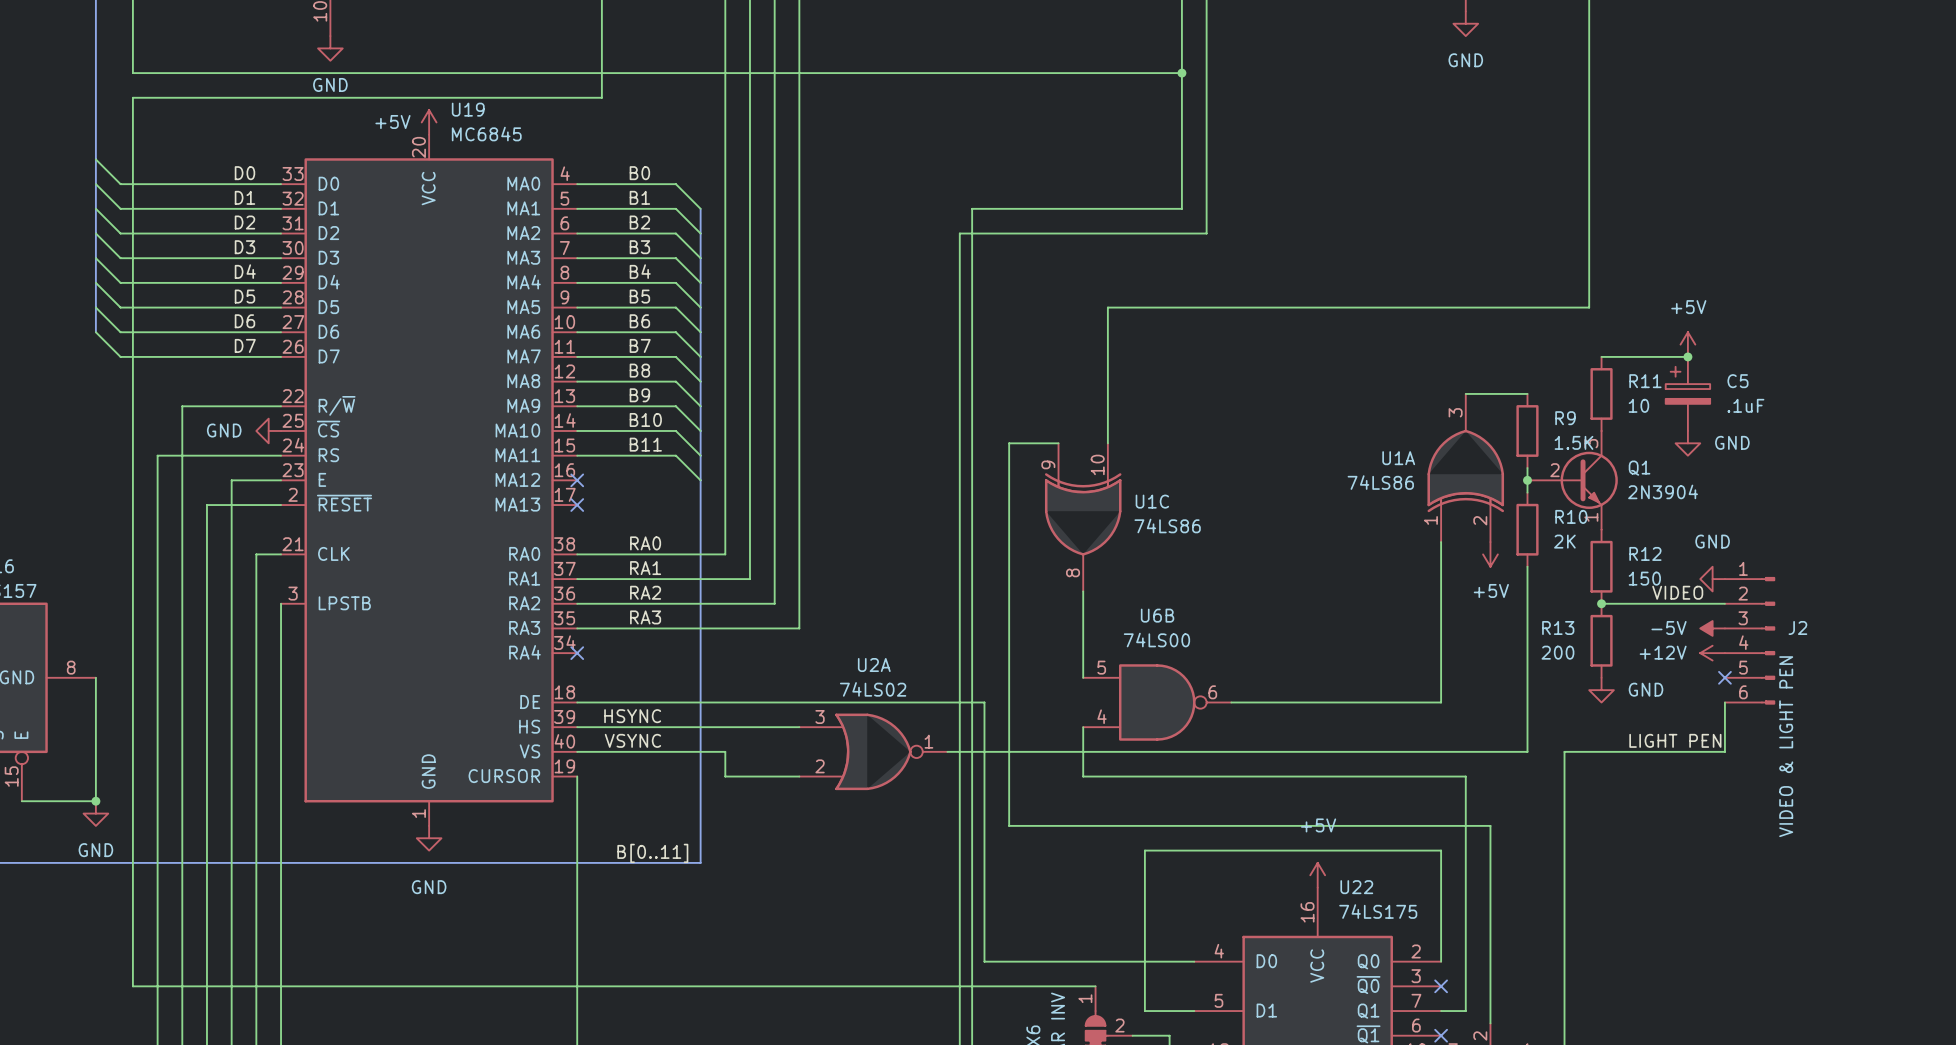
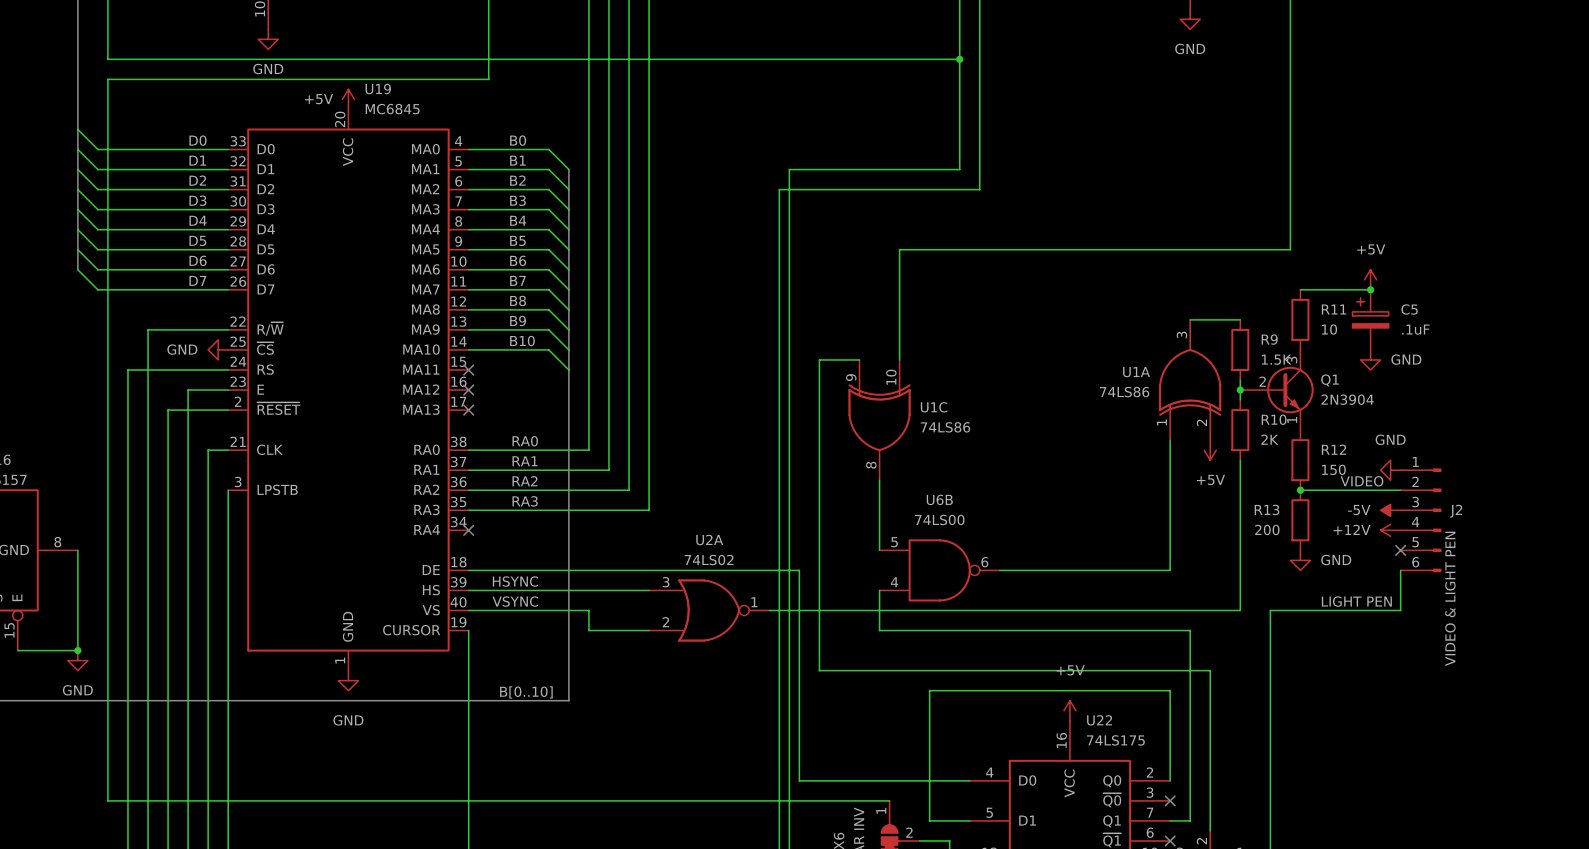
label: B11 (645, 444) -> none
wire: (577, 455) (675, 455) (700, 480) -> none
no-connect mark: none -> (468, 370)
label: B[0..11] (652, 853) -> B[0..10] (526, 692)

